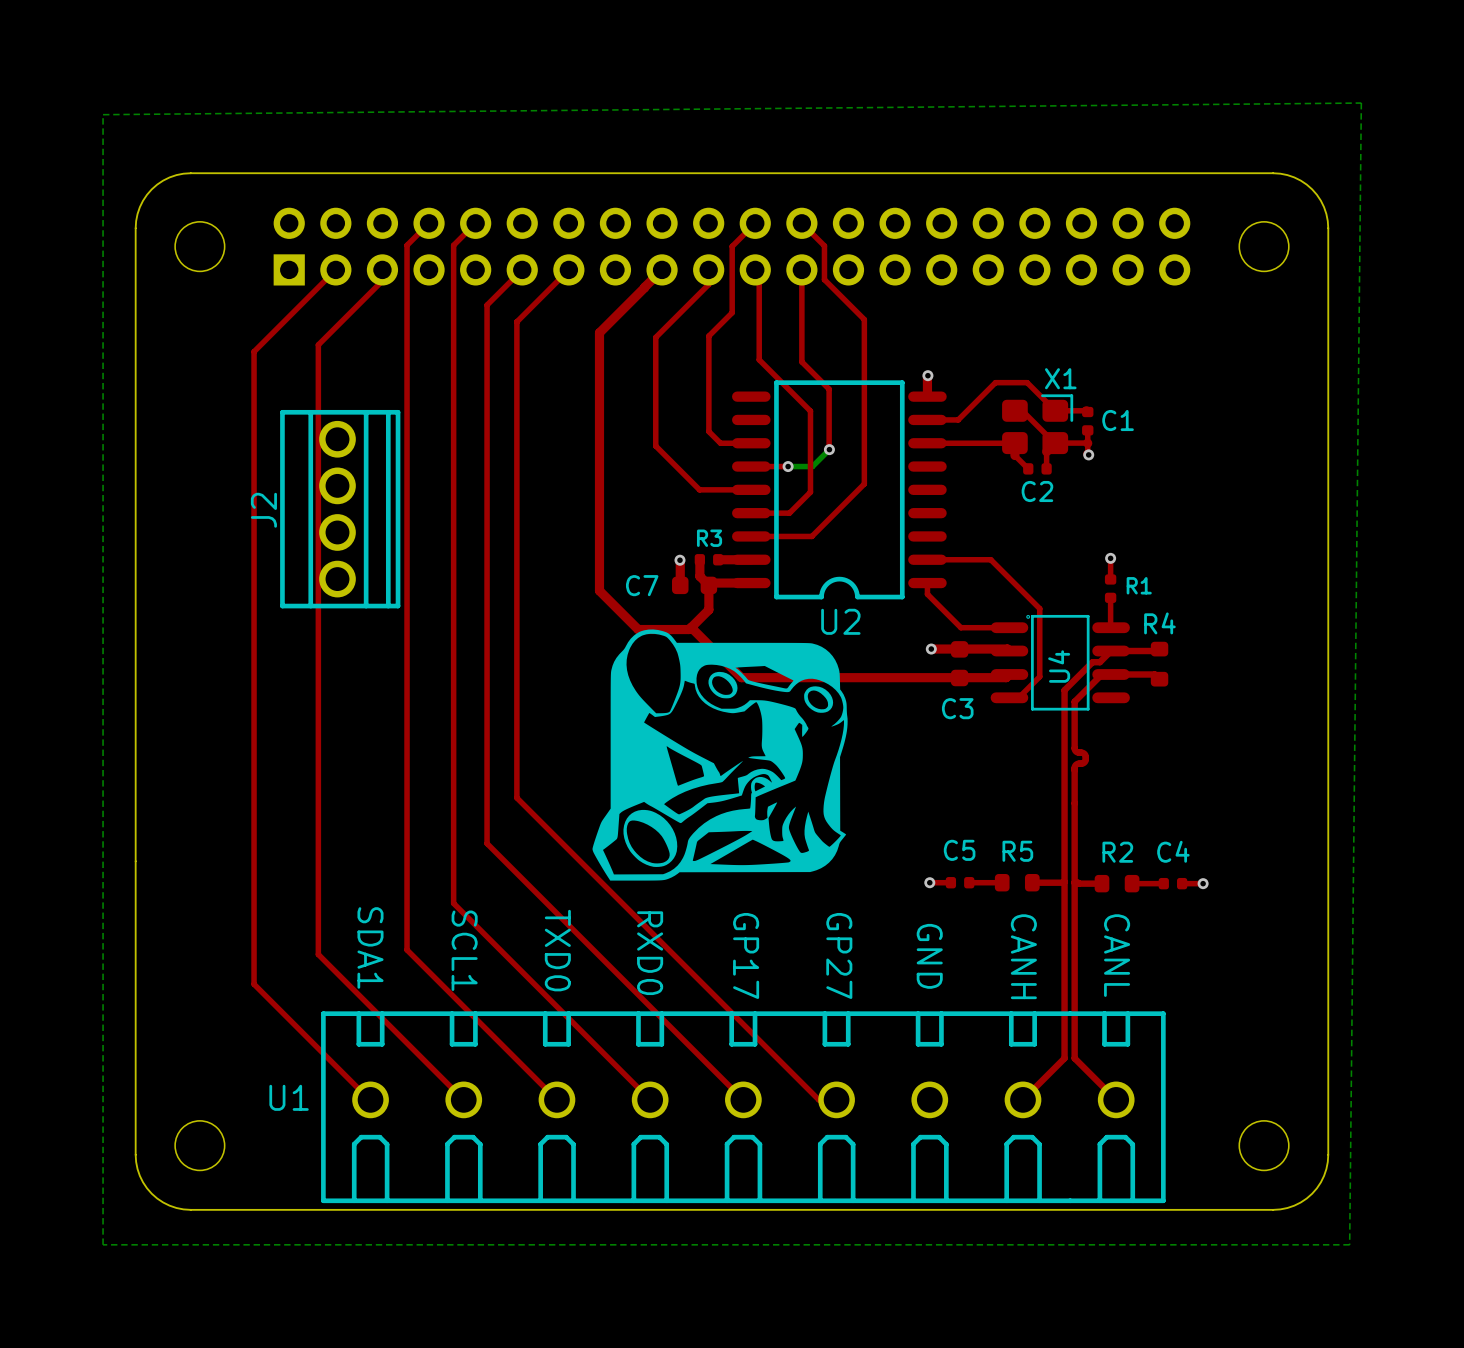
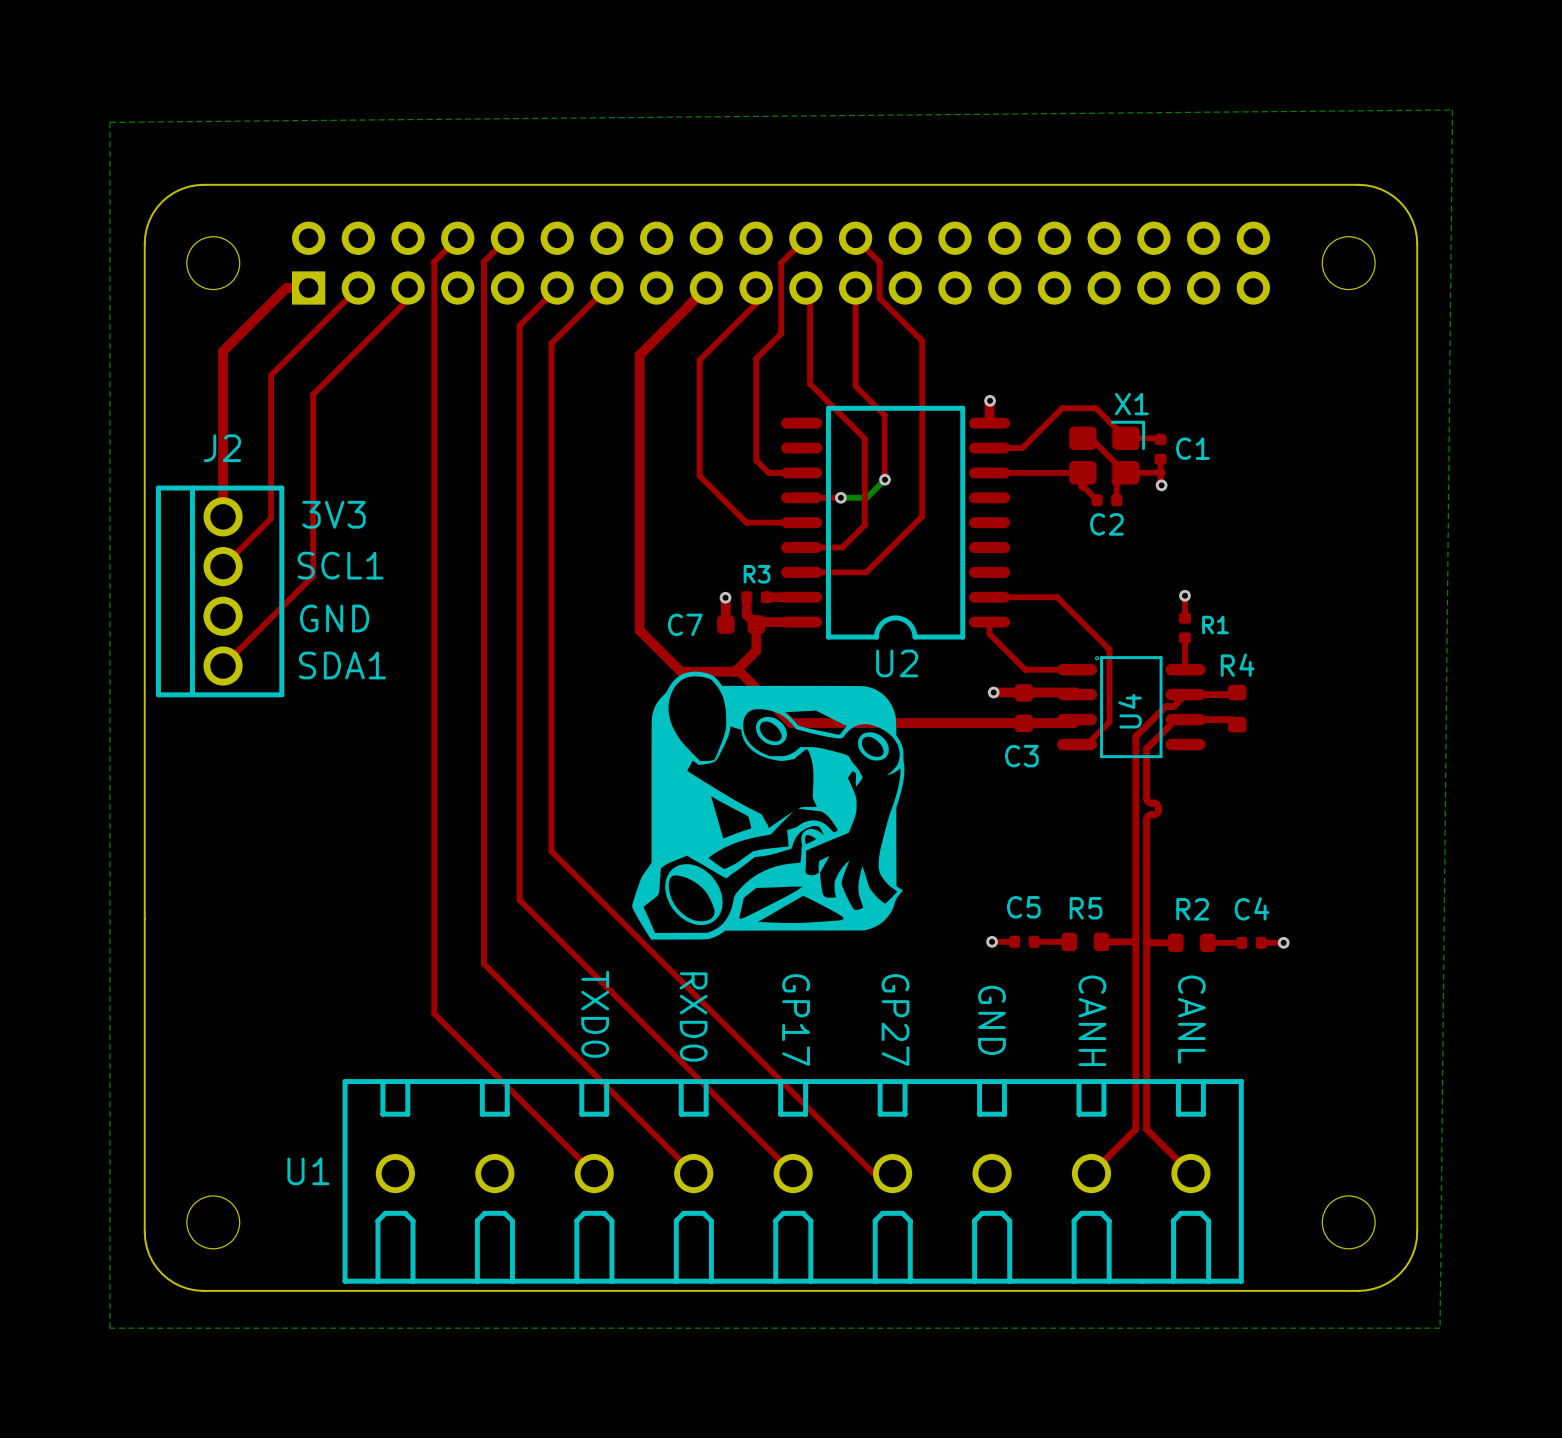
top track: none -> (308, 287) (286, 287) (223, 351) (223, 516)
top track: (318, 344) (318, 954) (463, 1099) -> (339, 368) (313, 394) (313, 575) (223, 666)
J2 footprint: [280, 409, 401, 609] -> [155, 485, 285, 698]
text: none -> 3V3 (334, 514)
top track: (254, 486) (254, 984) (369, 1099) -> (271, 518) (223, 566)
J2 name position: J2 (263, 510) -> J2 (222, 448)
text: none -> GND (334, 618)
text rotation: 0° (370, 947) -> 90° counterclockwise (342, 665)
text position: SDA1 (370, 947) -> SDA1 (342, 665)
text rotation: 0° (464, 950) -> 90° counterclockwise (340, 565)
text position: SCL1 (464, 950) -> SCL1 (340, 565)

